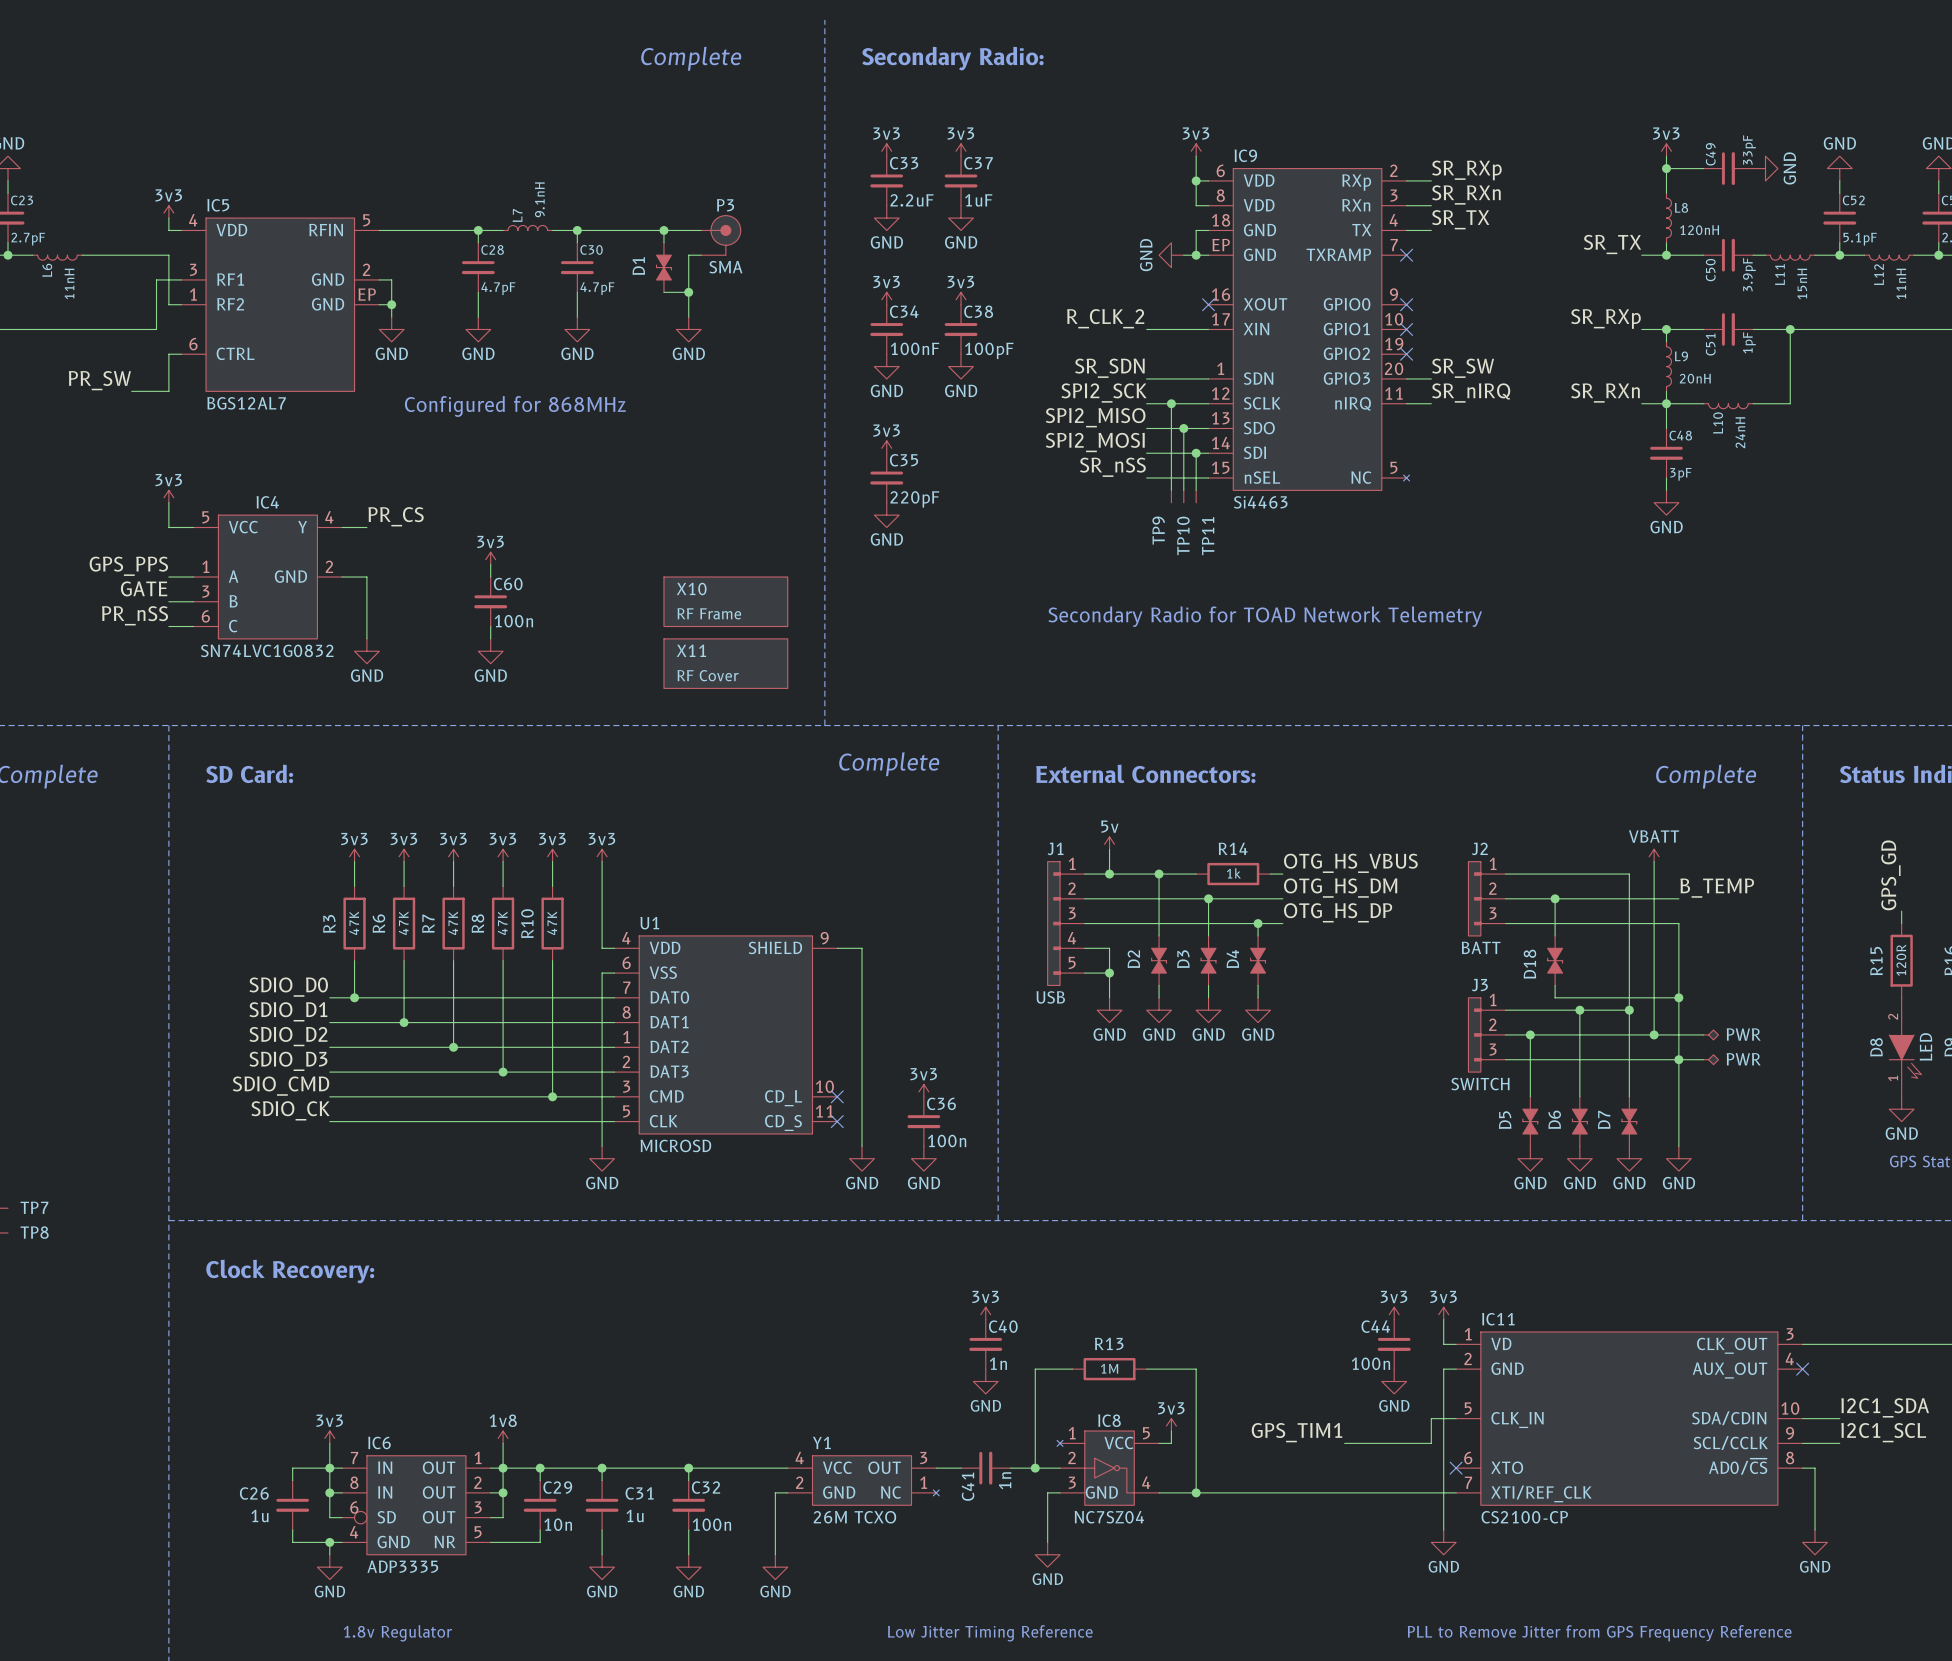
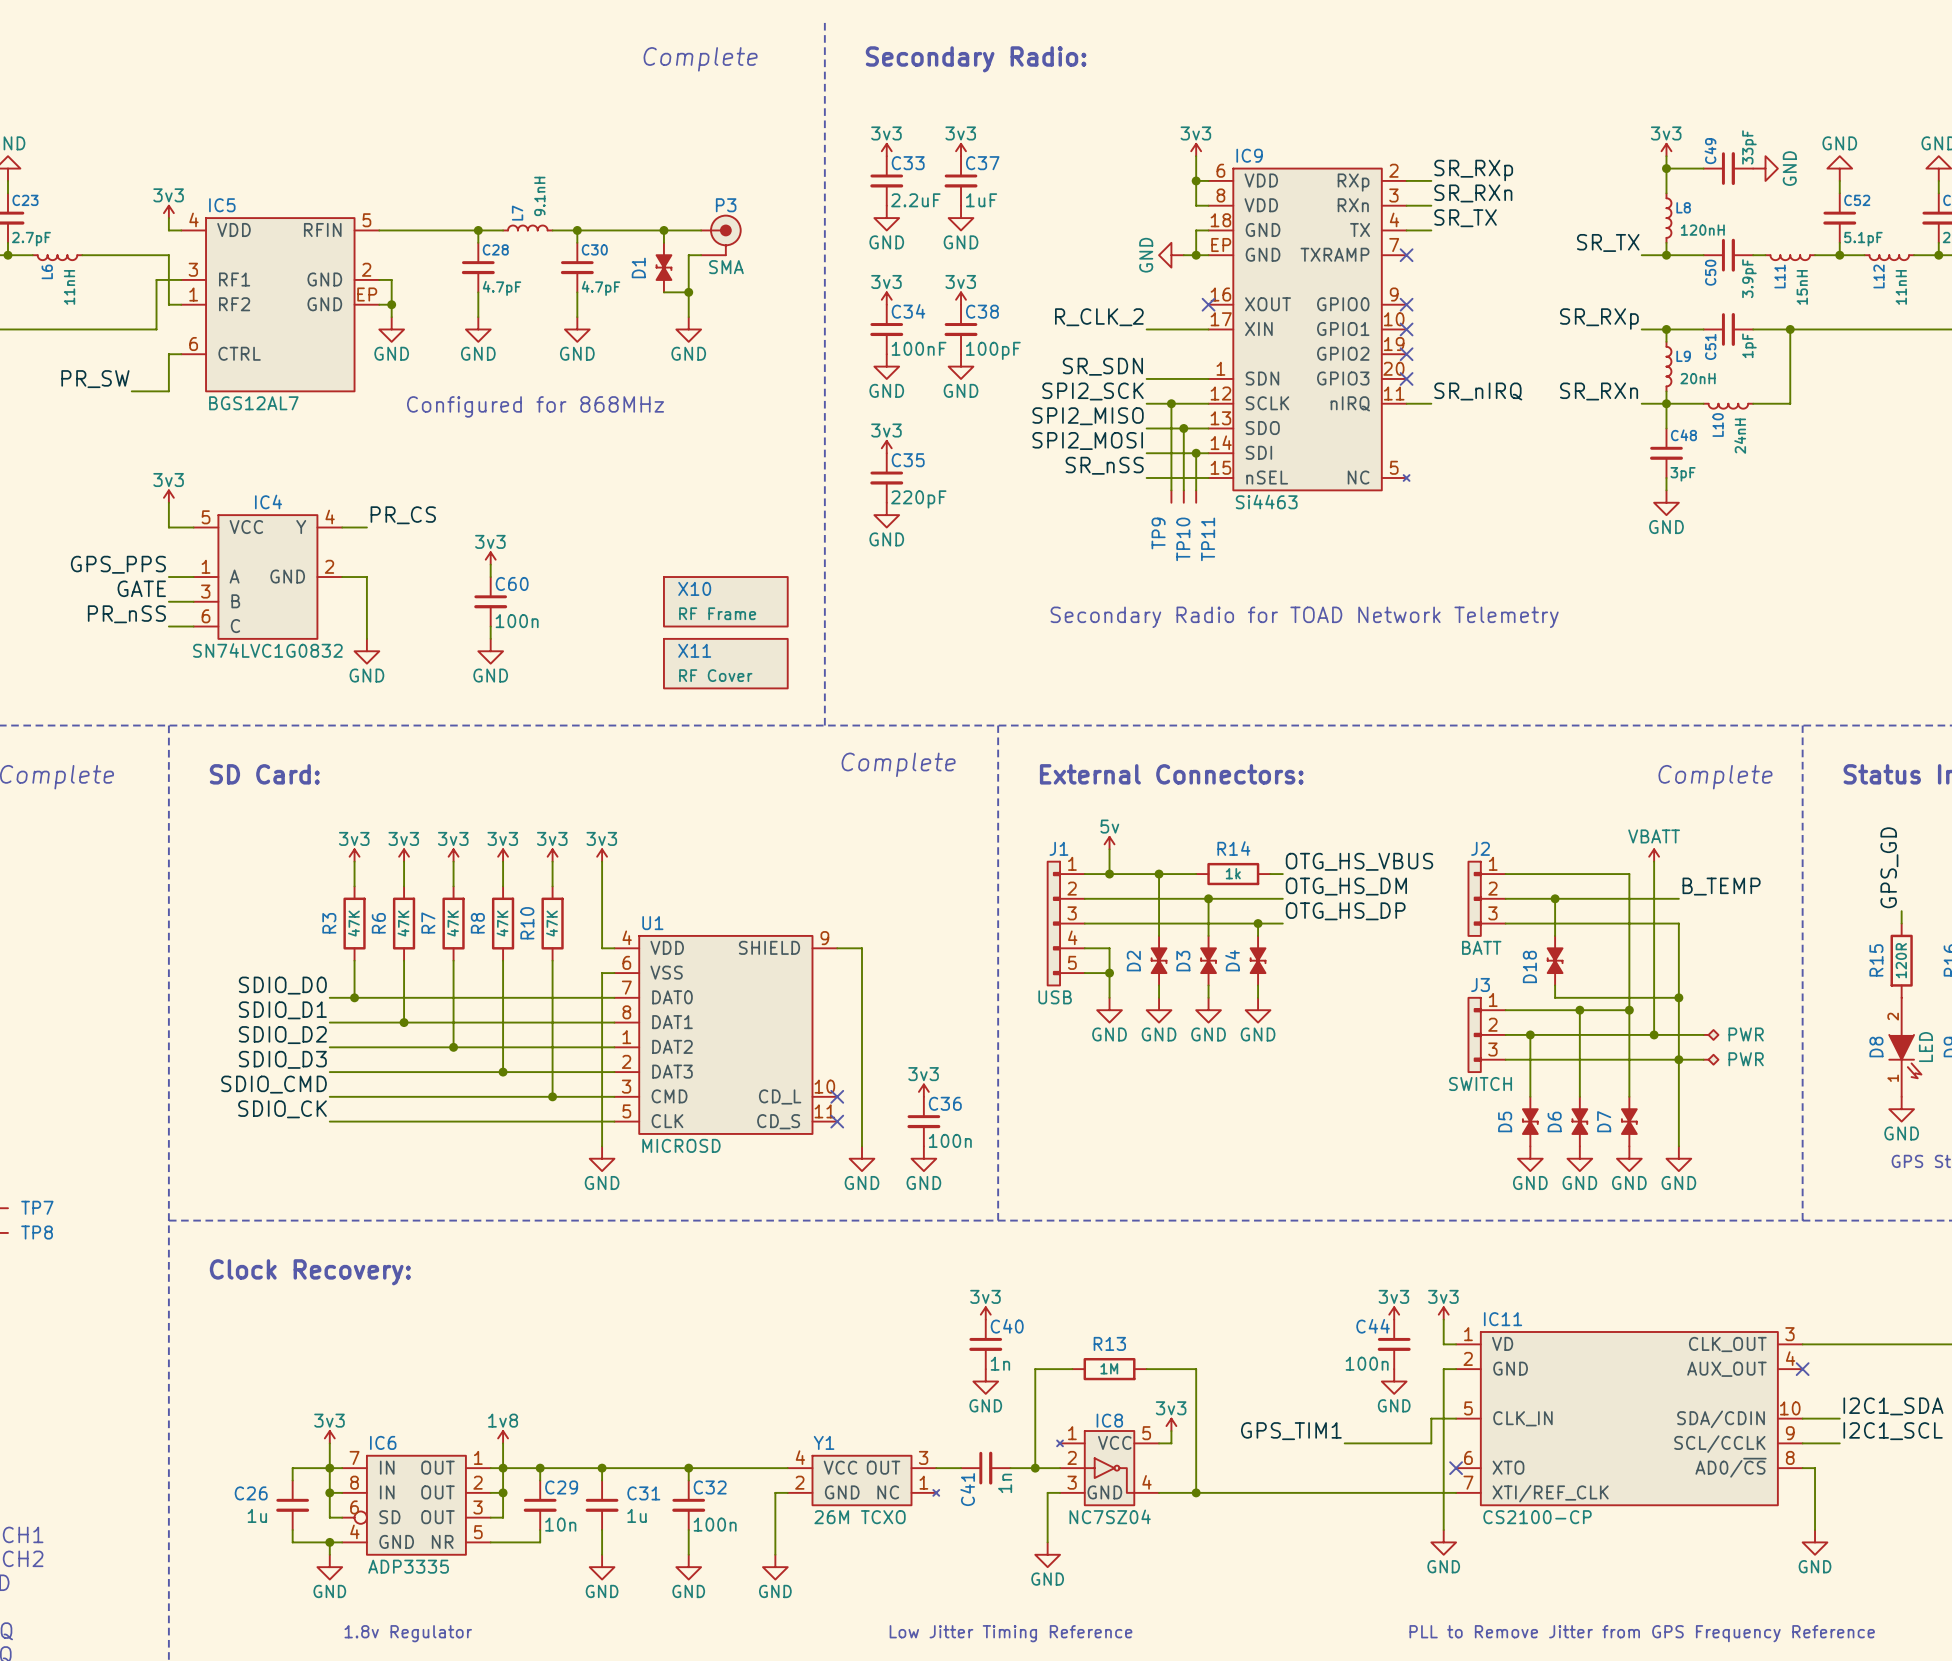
label: SR_SW (1463, 368) -> none
wire: (1406, 378) (1431, 378) -> none
no-connect mark: none -> (1406, 378)

